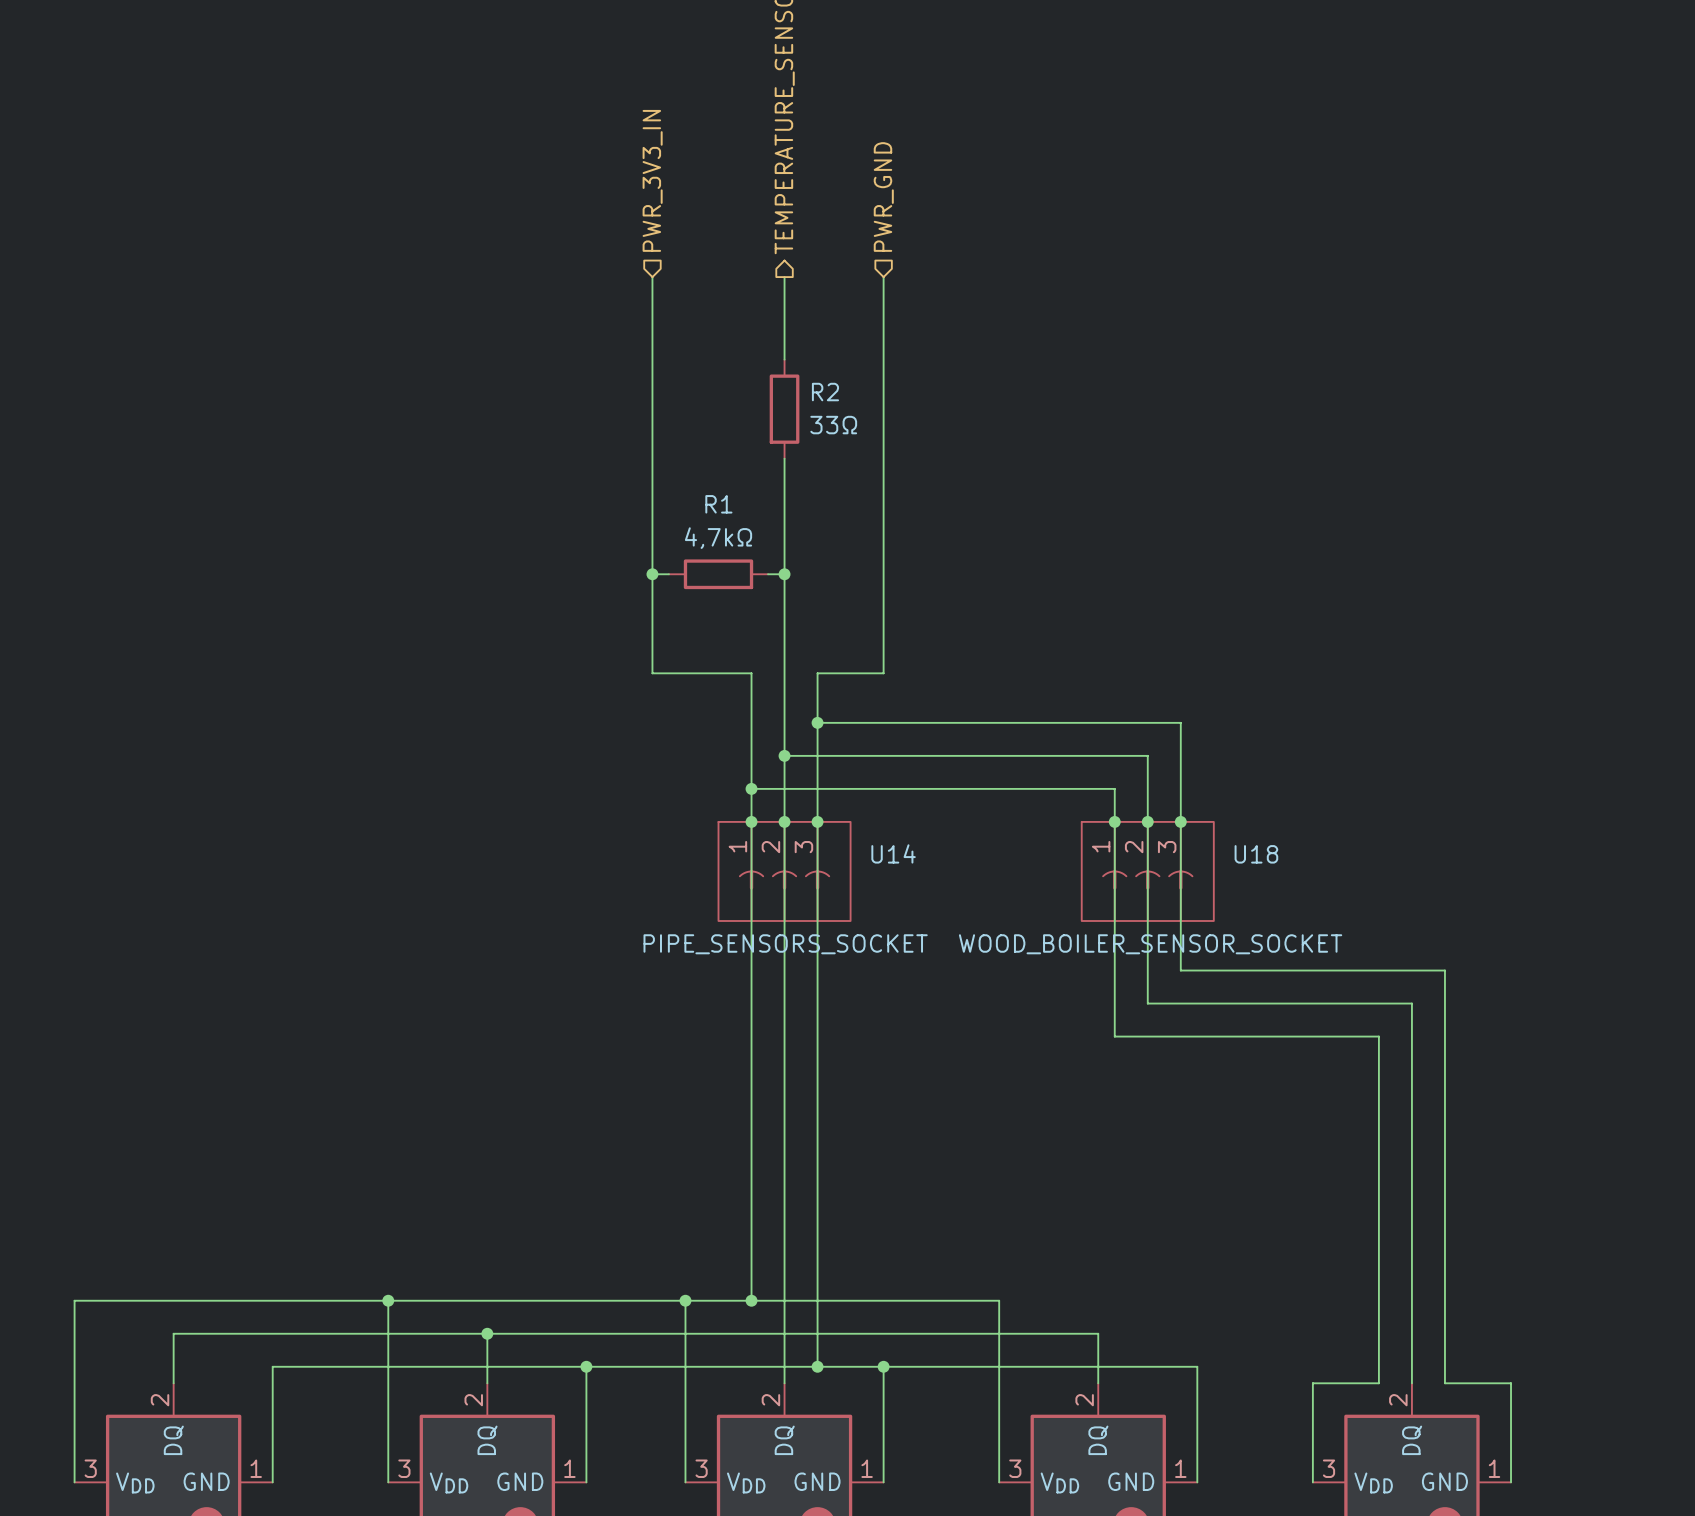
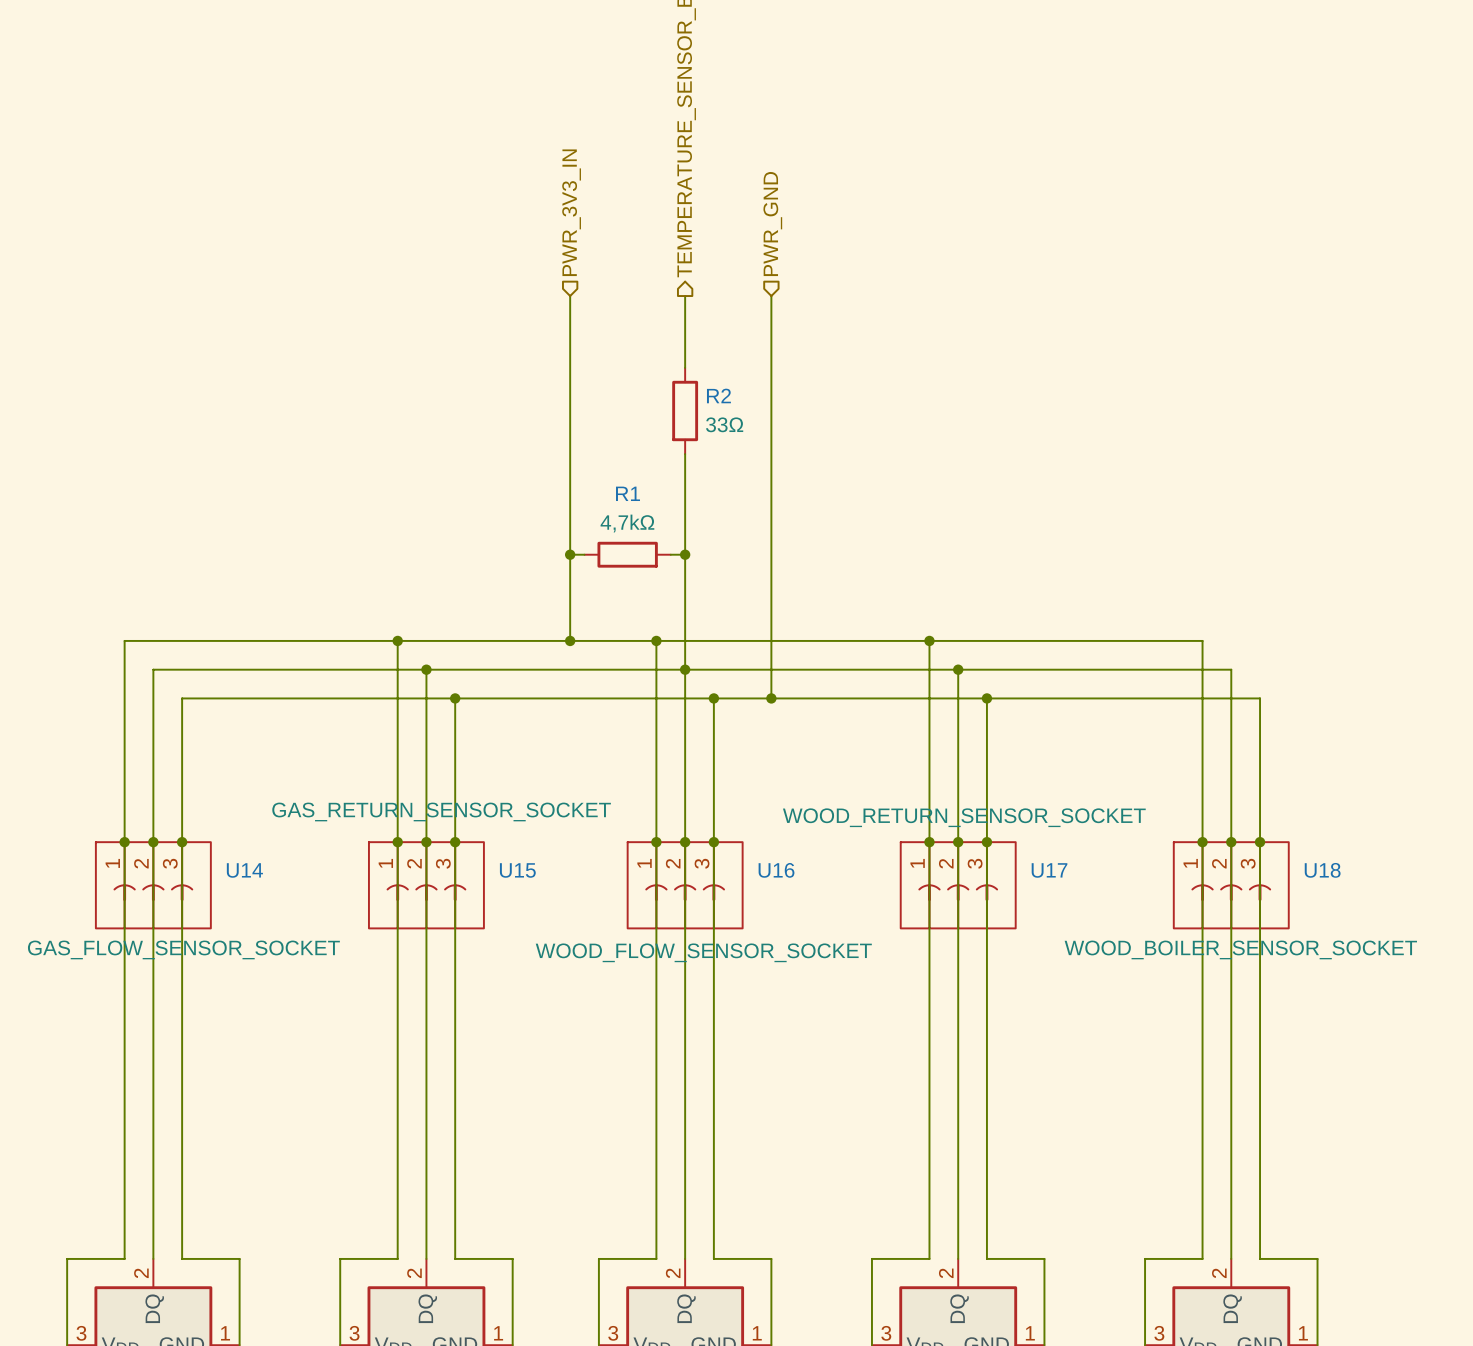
junction: none -> (397, 640)
junction: none -> (570, 640)
junction: none -> (656, 640)
wire: (817, 673) (817, 739) -> (713, 640) (656, 640)
wire: none -> (929, 640) (929, 1258) (871, 1258)
junction: none -> (929, 640)
wire: none -> (426, 669) (426, 1215)
junction: none -> (426, 669)
junction: none -> (685, 669)
wire: none -> (958, 669) (958, 1215)
junction: none -> (958, 669)
wire: (817, 722) (1180, 722) (1180, 970) (1444, 970) -> none
junction position: (817, 722) -> (713, 698)
junction: none -> (455, 698)
junction: none -> (771, 698)
wire: none -> (986, 698) (986, 1258) (1044, 1258)
junction: none -> (986, 698)
wire: (784, 755) (1147, 755) (1147, 1003) (1411, 1003) -> none
junction: (784, 755) -> none
wire: (751, 788) (1114, 788) (1114, 1036) (1378, 1036) -> (771, 698) (771, 640) (1202, 640) (1202, 957)
junction: (751, 788) -> none
junction: (751, 821) -> none
junction: (784, 821) -> none
junction: (817, 821) -> none
junction: (1114, 821) -> none
junction: (1147, 821) -> none
junction: (1180, 821) -> none
U14 position: (784, 871) -> (153, 885)
U18 position: (1147, 871) -> (1231, 885)
junction: none -> (124, 842)
junction: none -> (153, 842)
junction: none -> (182, 842)
junction: none -> (397, 842)
junction: none -> (426, 842)
junction: none -> (455, 842)
junction: none -> (656, 842)
junction: none -> (685, 842)
junction: none -> (713, 842)
junction: none -> (929, 842)
junction: none -> (958, 842)
junction: none -> (986, 842)
junction: none -> (1202, 842)
junction: none -> (1231, 842)
junction: none -> (1260, 842)
U14 value: PIPE_SENSORS_SOCKET (785, 944) -> GAS_FLOW_SENSOR_SOCKET (183, 949)
U15: none -> GAS_RETURN_SENSOR_SOCKET (426, 885)
U16: none -> WOOD_FLOW_SENSOR_SOCKET (685, 885)
U17: none -> WOOD_RETURN_SENSOR_SOCKET (958, 885)
wire: (388, 1300) (388, 1383) -> (397, 640) (397, 1258) (340, 1258)
junction: (388, 1300) -> none
wire: (685, 1300) (685, 1383) -> (656, 1187) (656, 1258) (598, 1258)
junction: (685, 1300) -> none
junction: (751, 1300) -> none
wire: (173, 1333) (1098, 1333) -> (153, 1215) (153, 669) (1231, 669) (1231, 928)
junction: (487, 1333) -> none
wire: (586, 1366) (586, 1383) -> (455, 698) (455, 1258) (512, 1258)
junction: (586, 1366) -> none
junction: (817, 1366) -> none
wire: (883, 1366) (883, 1383) -> (713, 1244) (713, 1258) (771, 1258)
junction: (883, 1366) -> none
wire: (74, 1383) (74, 1300) (999, 1300) (999, 1383) -> (67, 1258) (124, 1258) (124, 640) (570, 640)
wire: (272, 1383) (272, 1366) (1197, 1366) (1197, 1383) -> (239, 1258) (182, 1258) (182, 698) (1260, 698) (1260, 899)

